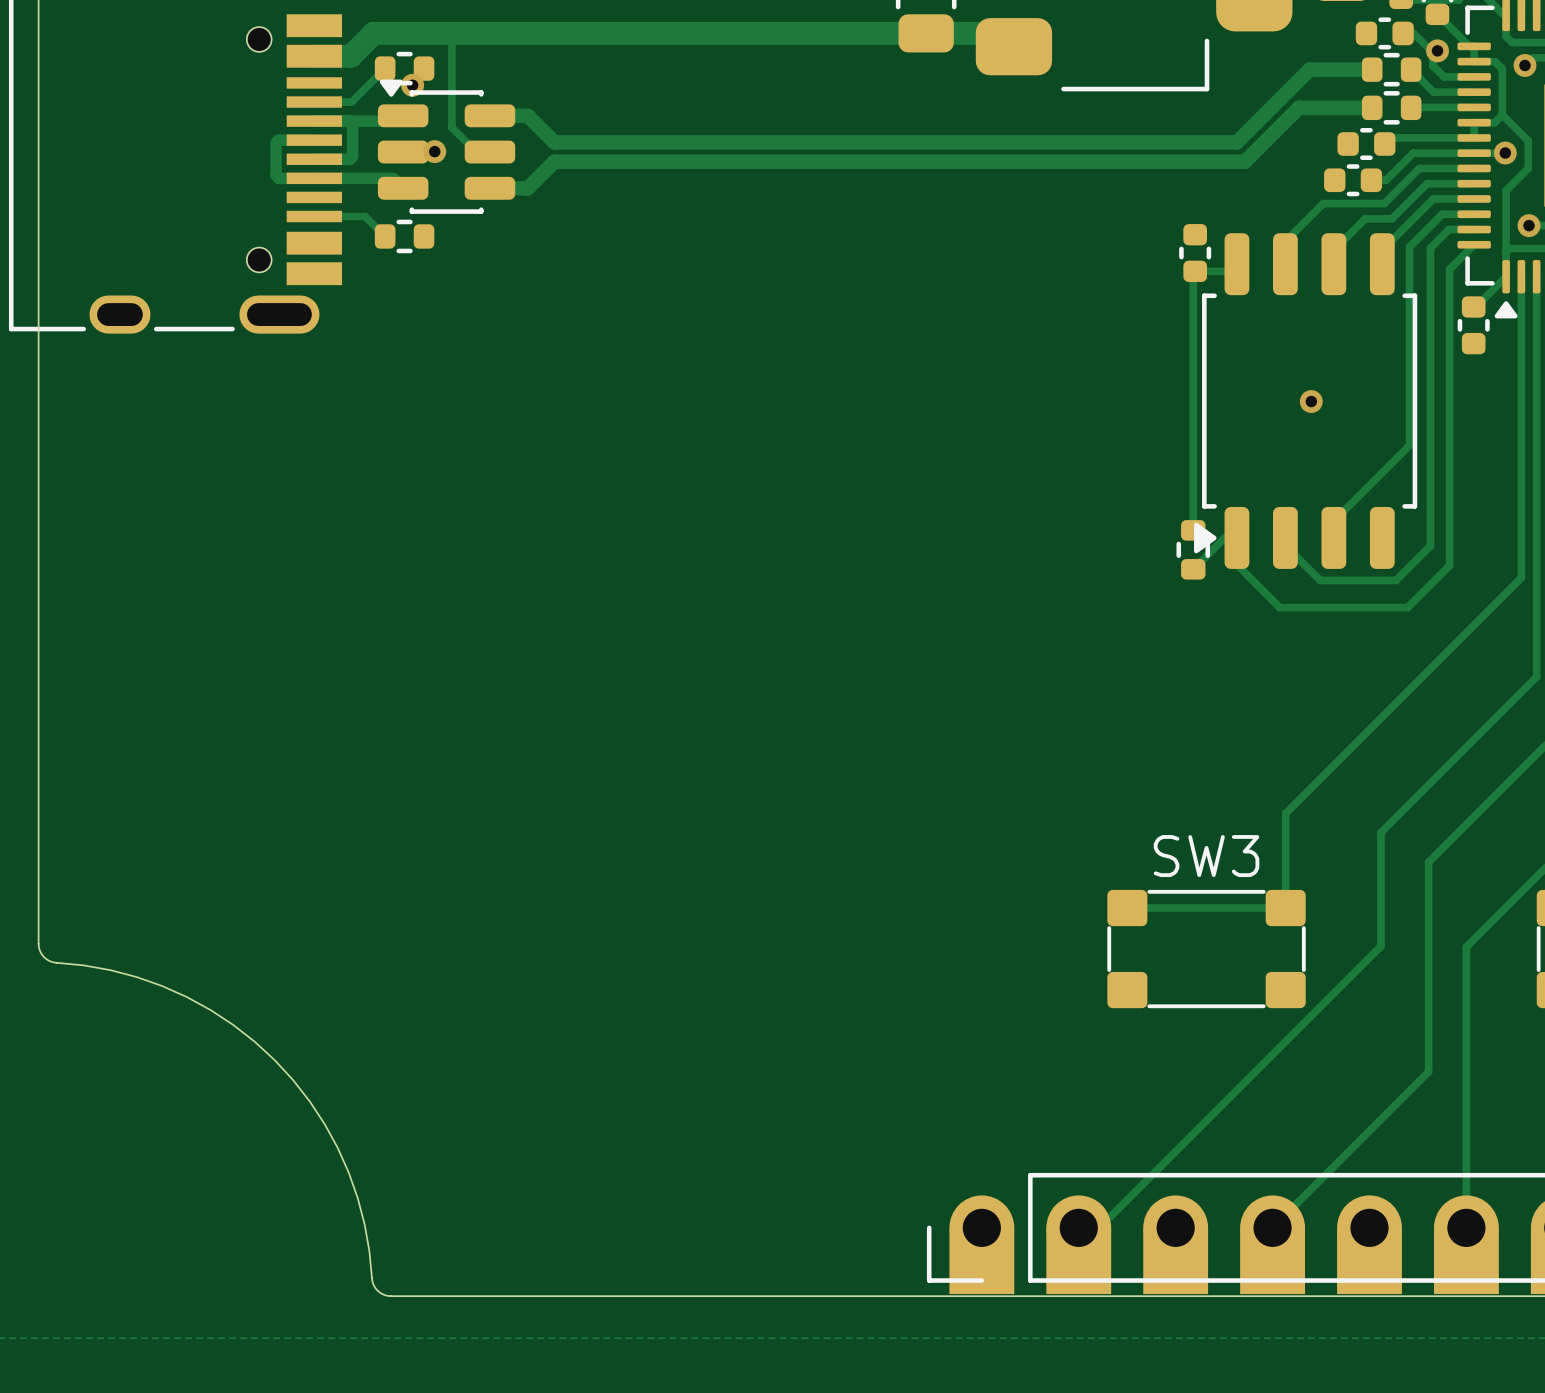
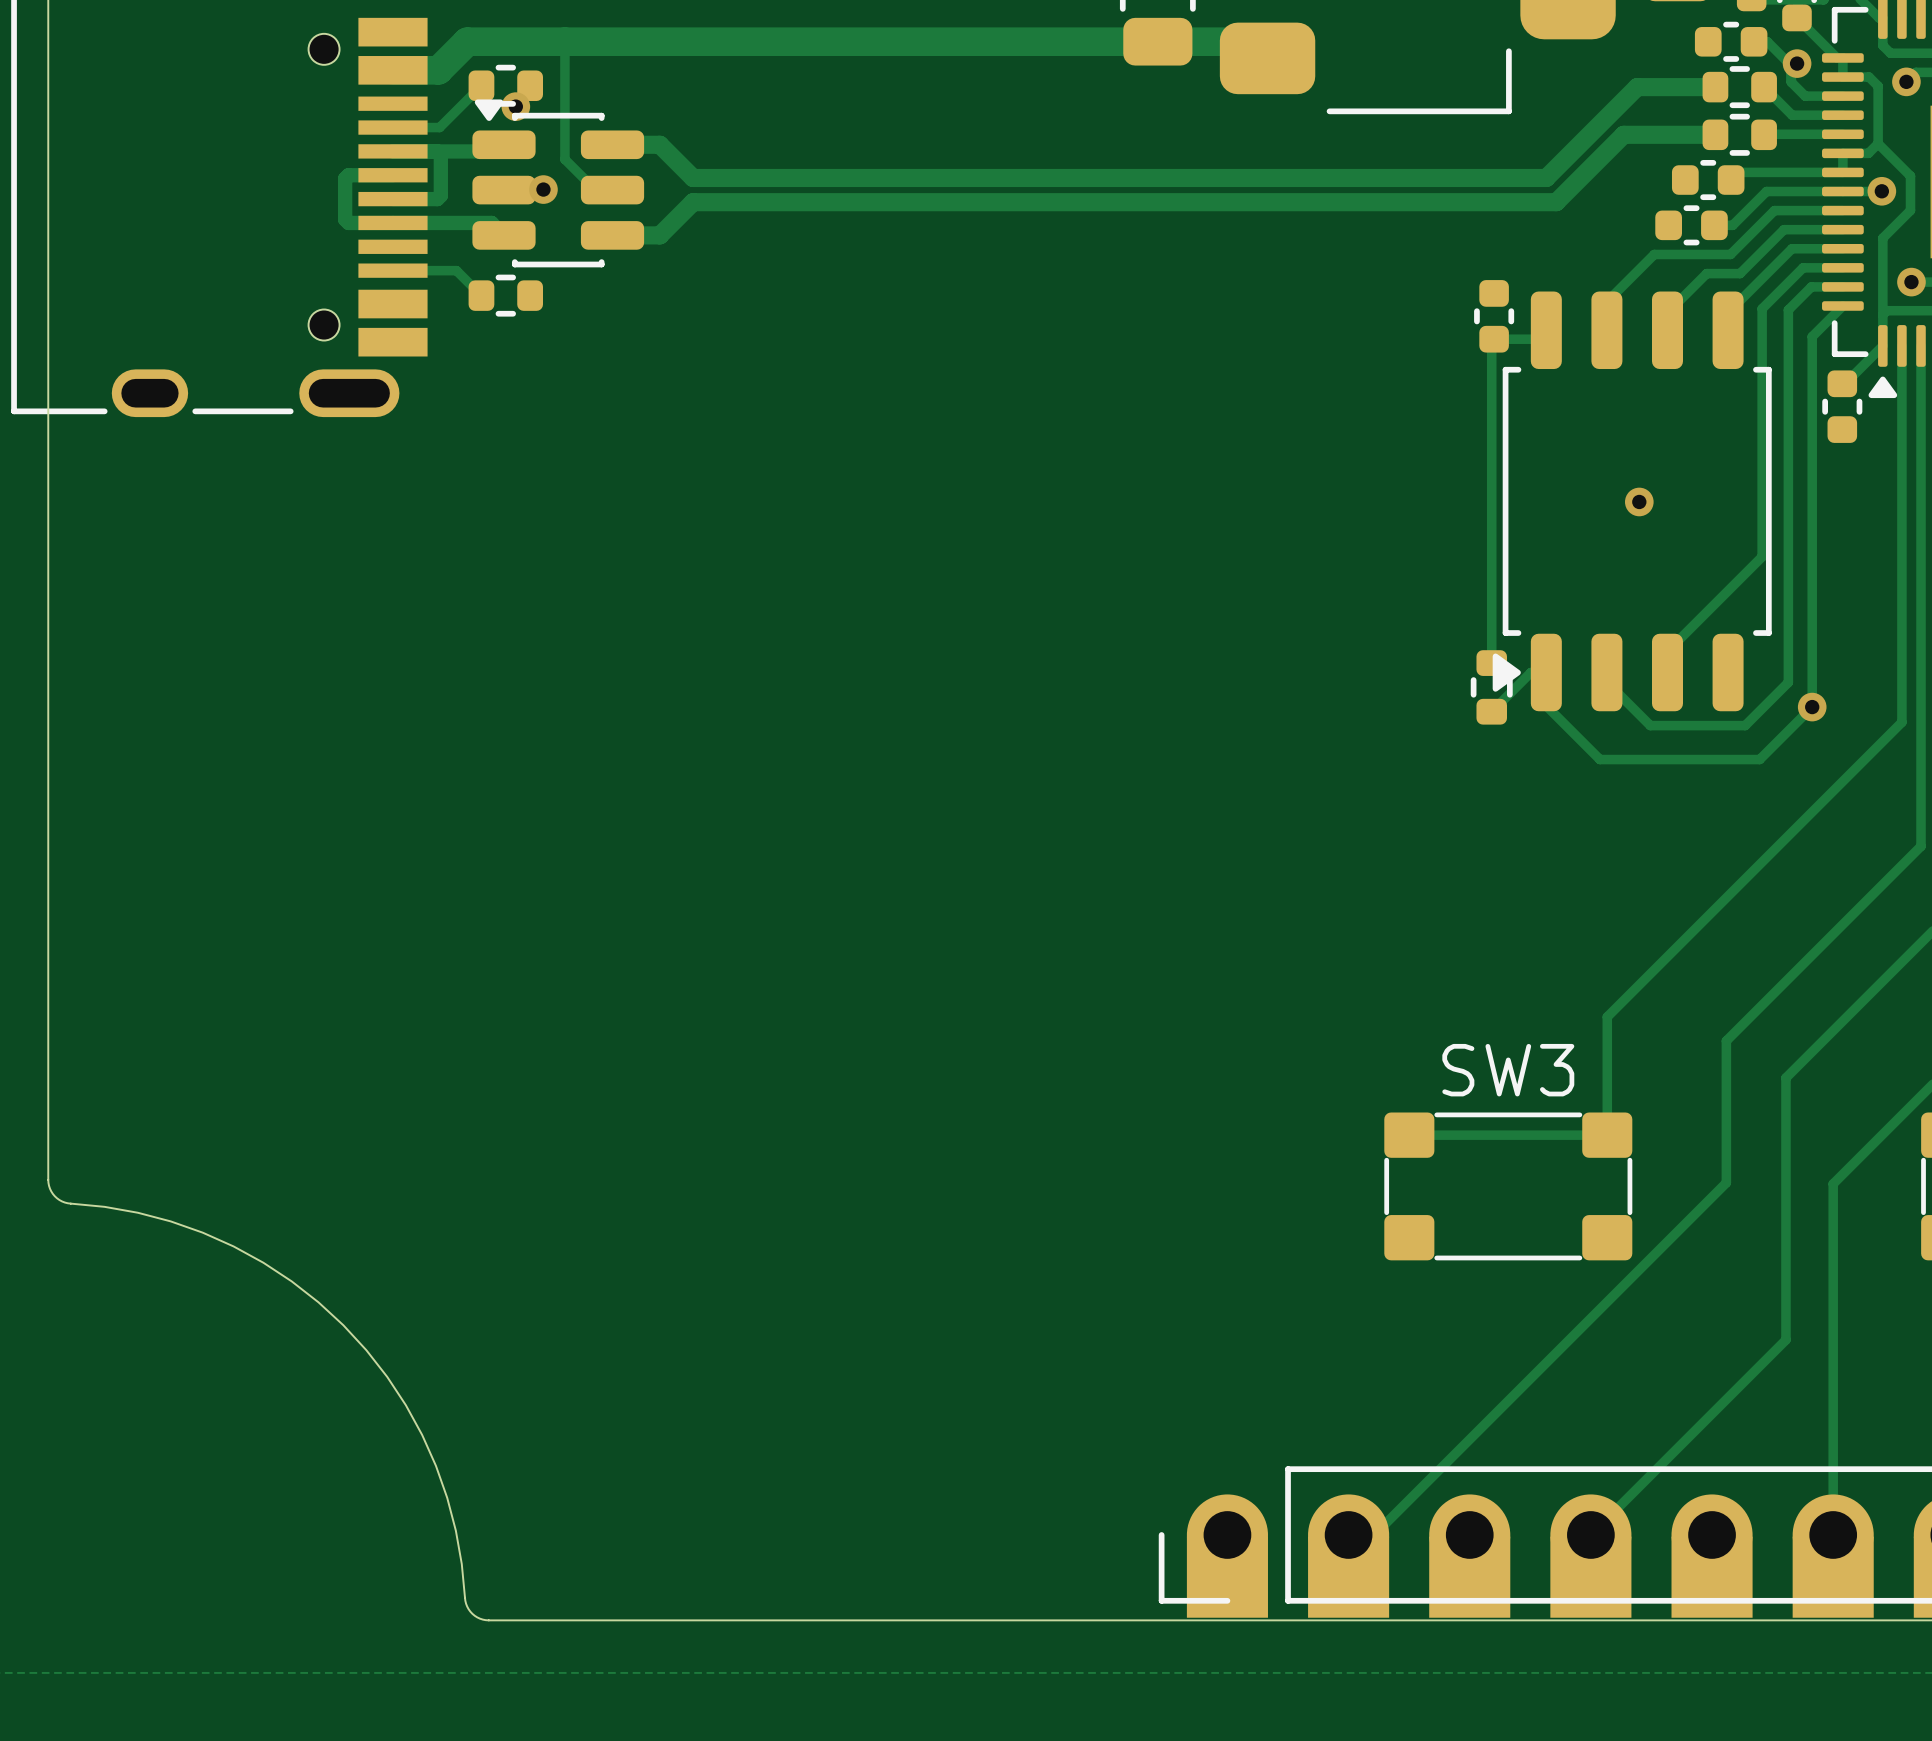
via: none -> (1812, 707)

